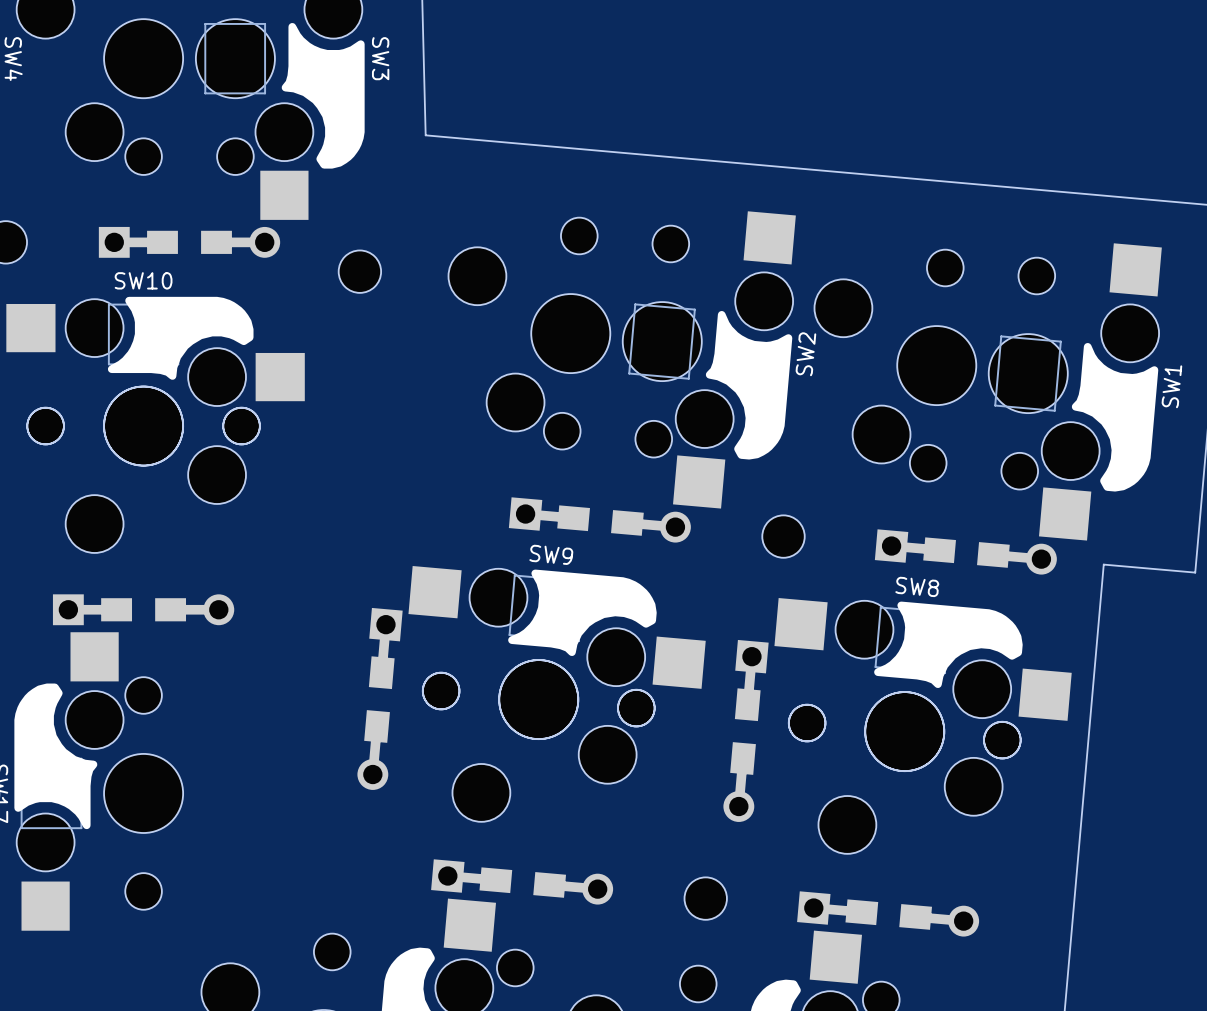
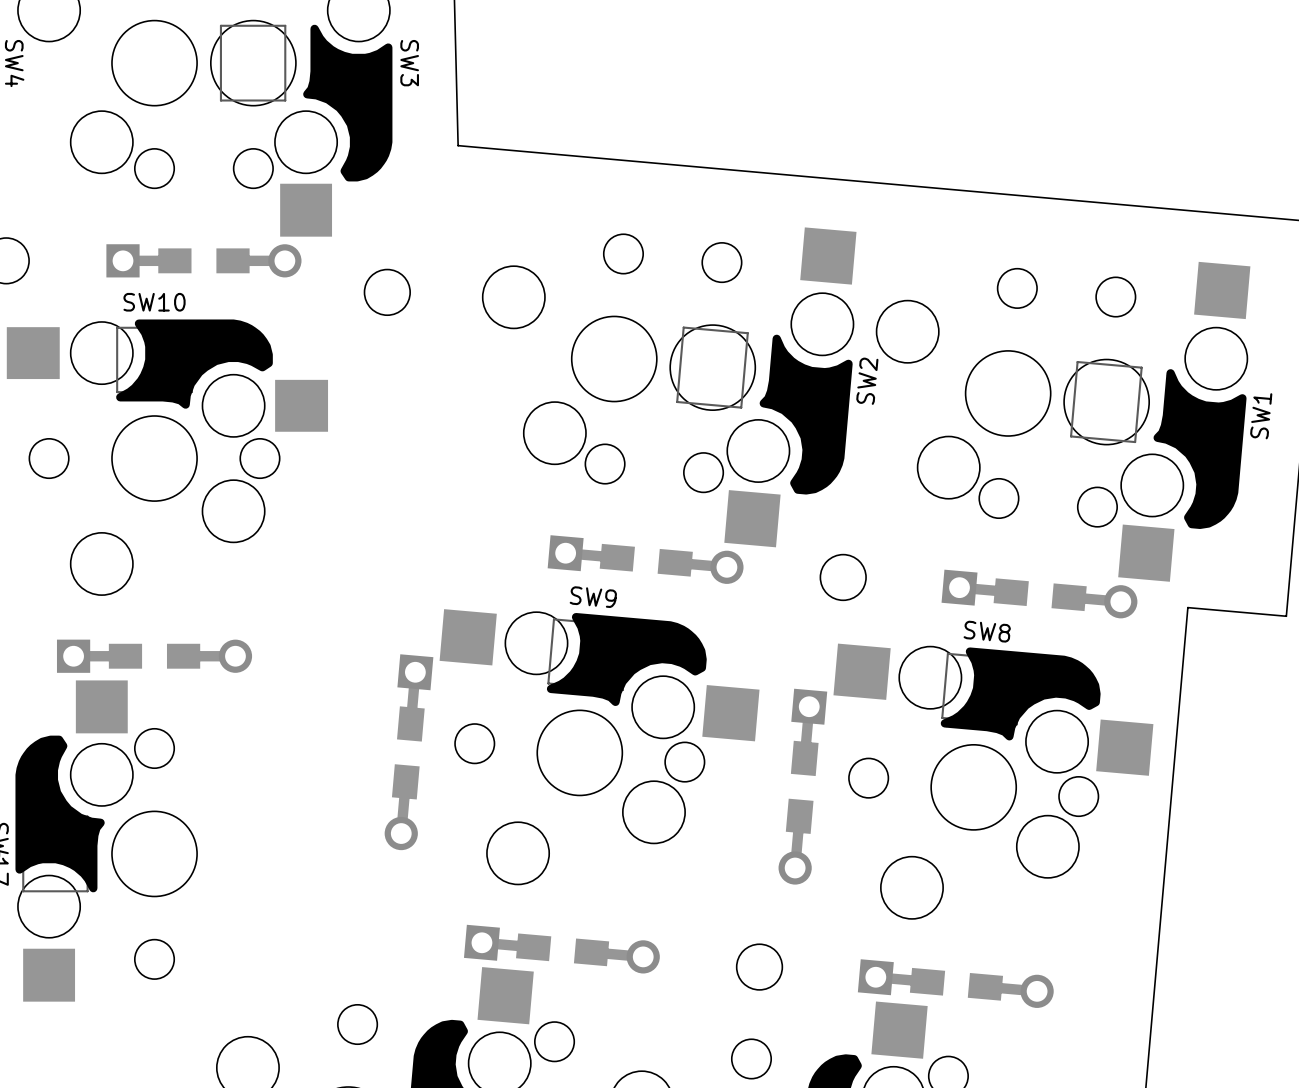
SW10 footprint: [6, 296, 305, 466] -> [6, 319, 329, 437]
SW9 footprint: [408, 566, 706, 740] -> [439, 609, 760, 742]
SW8 footprint: [774, 598, 1072, 772] -> [833, 643, 1154, 776]

